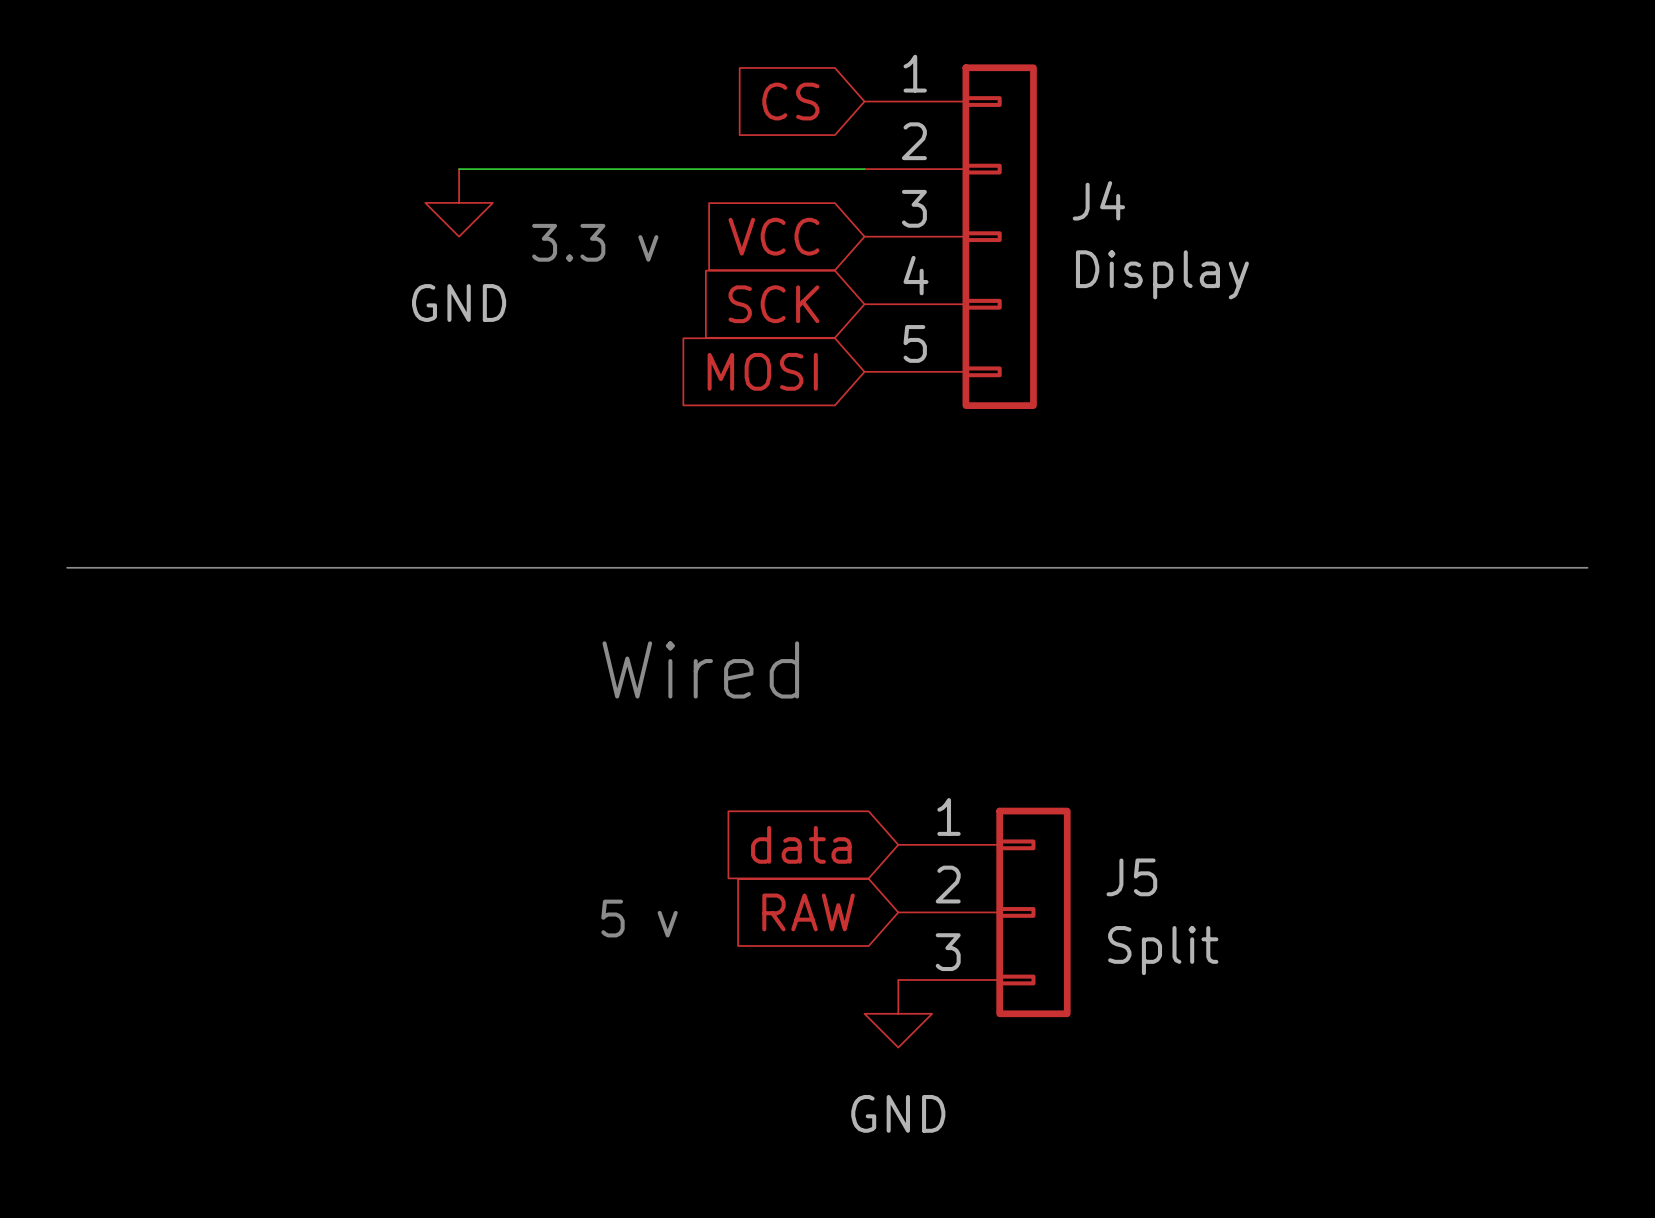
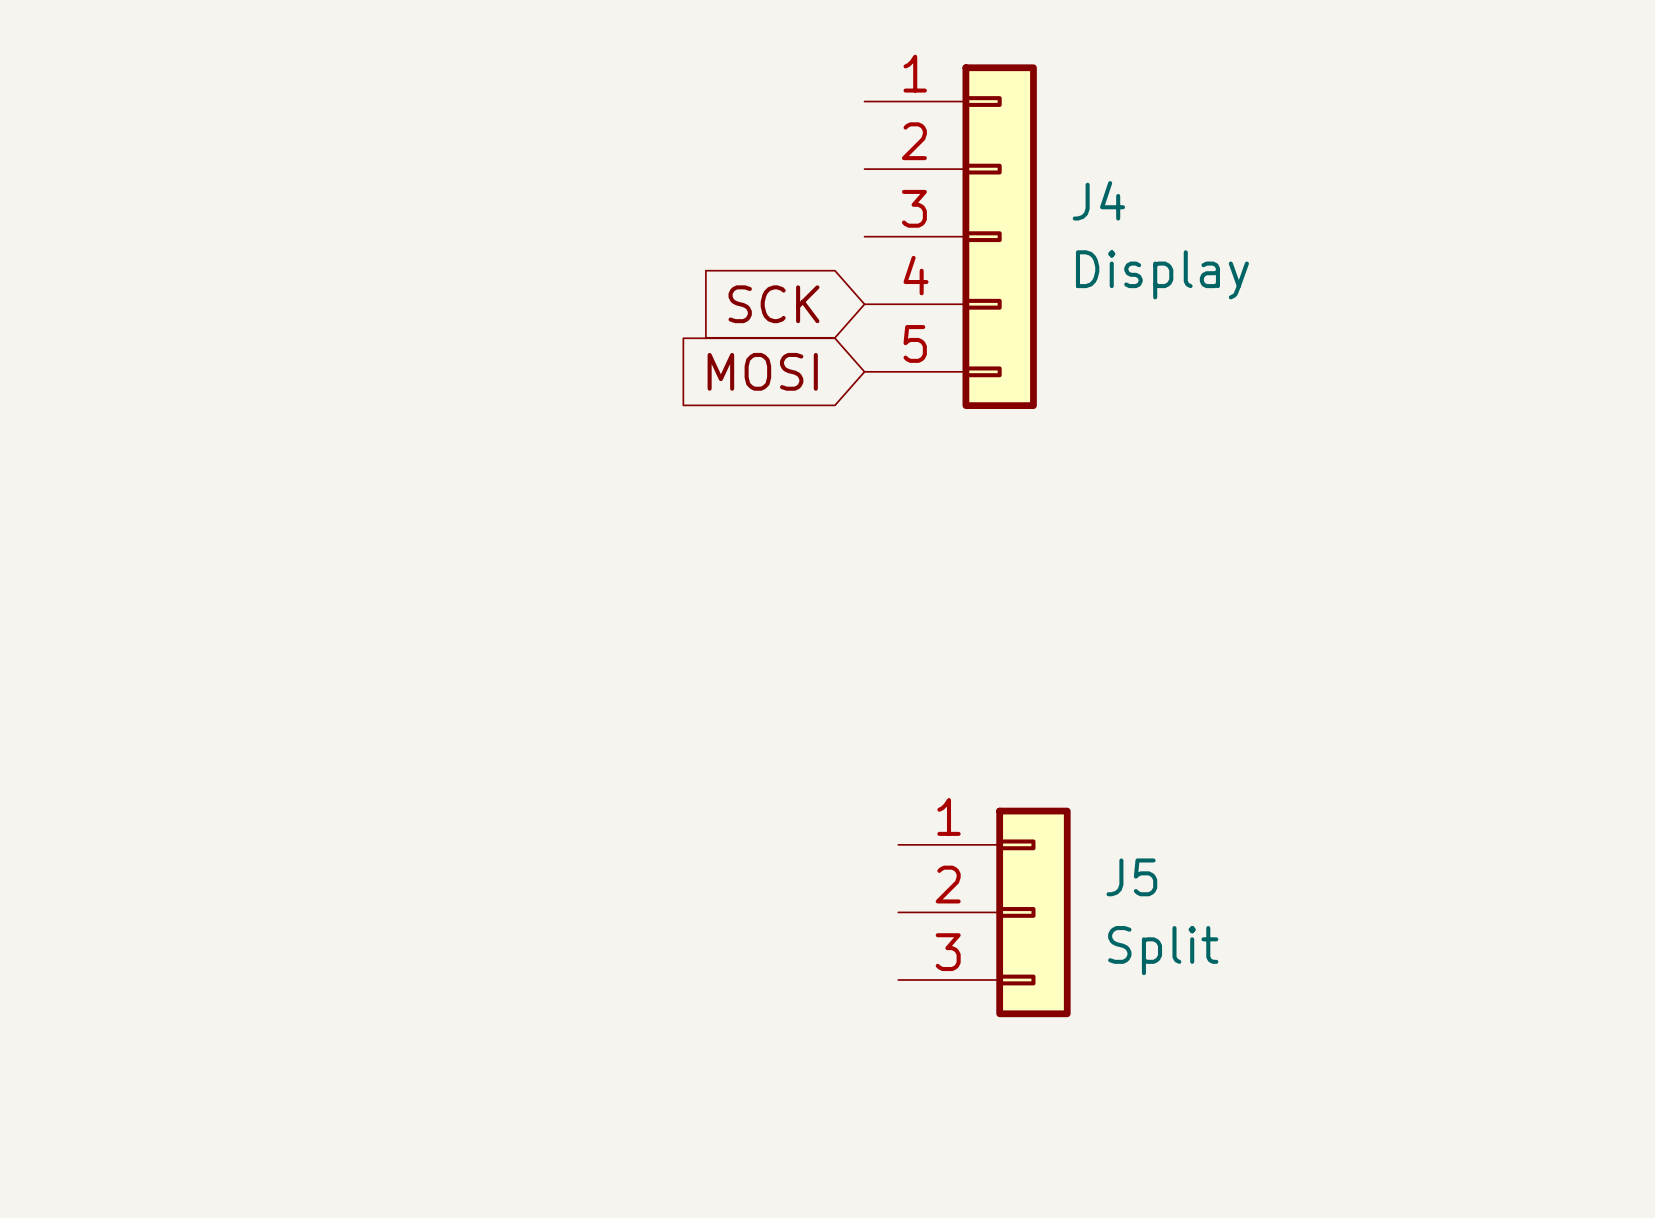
global label: CS (790, 101) -> none
wire: (459, 169) (864, 169) -> none
power symbol: GND (459, 202) -> none
global label: VCC (773, 236) -> none
text: 3.3 v (595, 242) -> none
line: (67, 567) (1587, 567) -> none
text: Wired (700, 669) -> none
global label: data (801, 844) -> none
global label: RAW (808, 912) -> none
text: 5 v (639, 918) -> none
power symbol: GND (898, 1013) -> none

